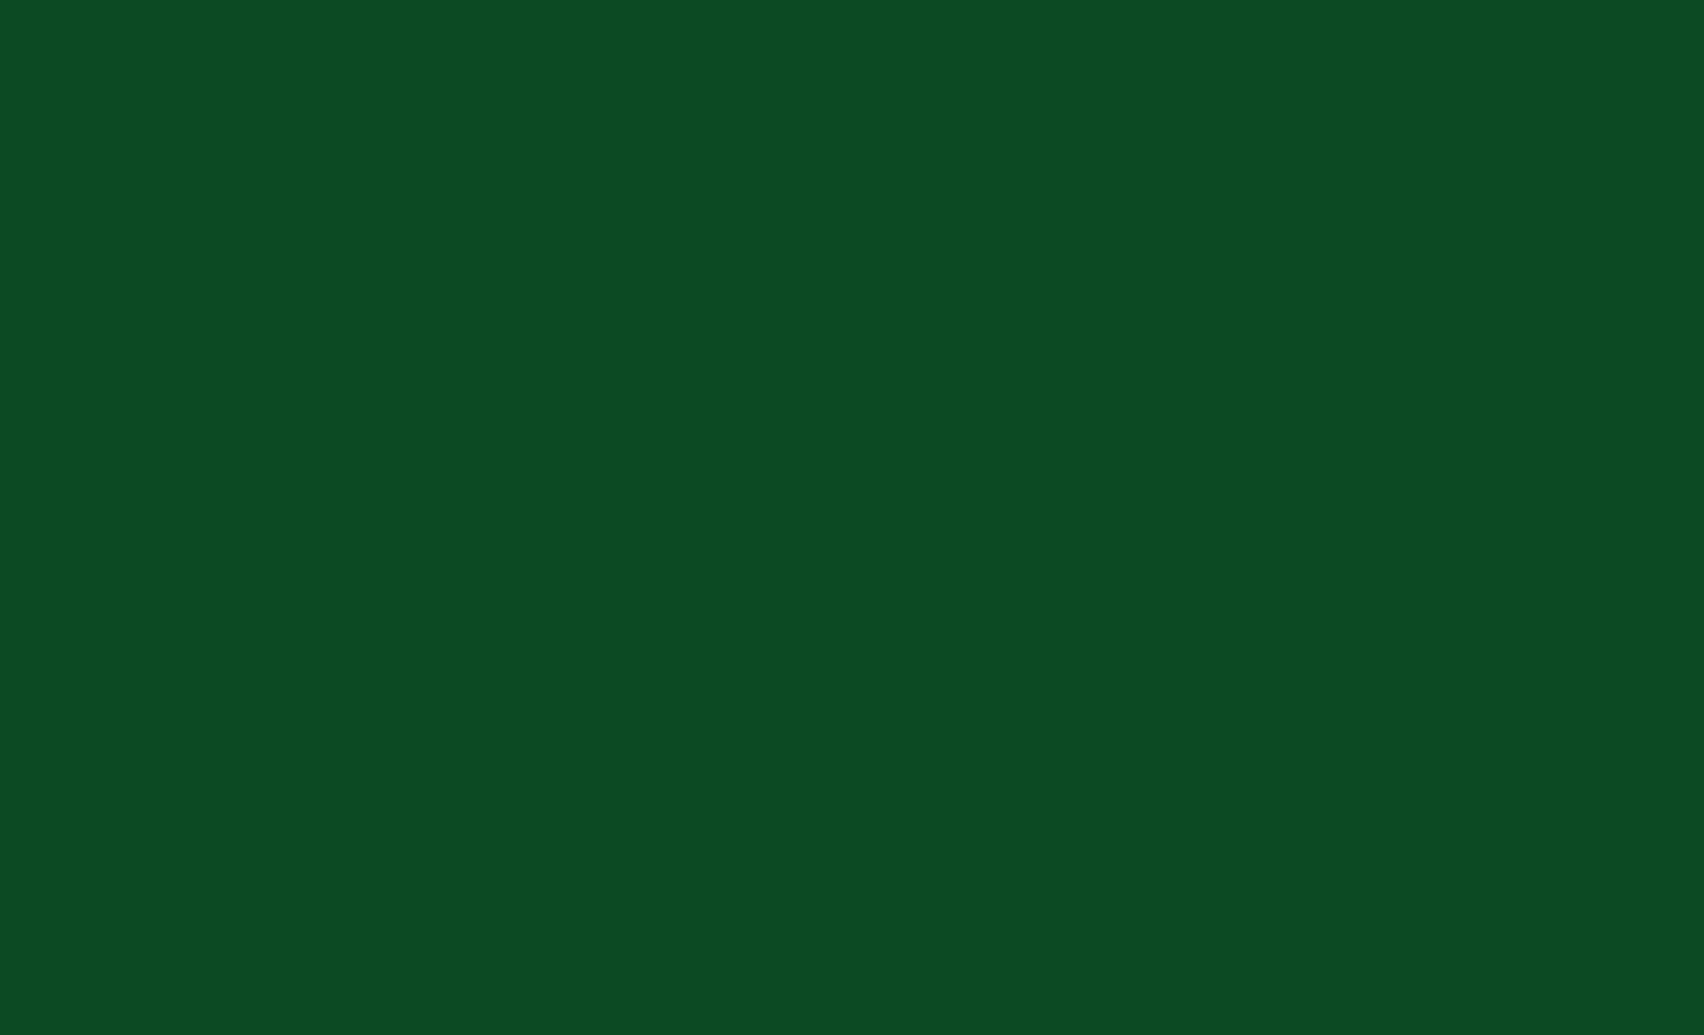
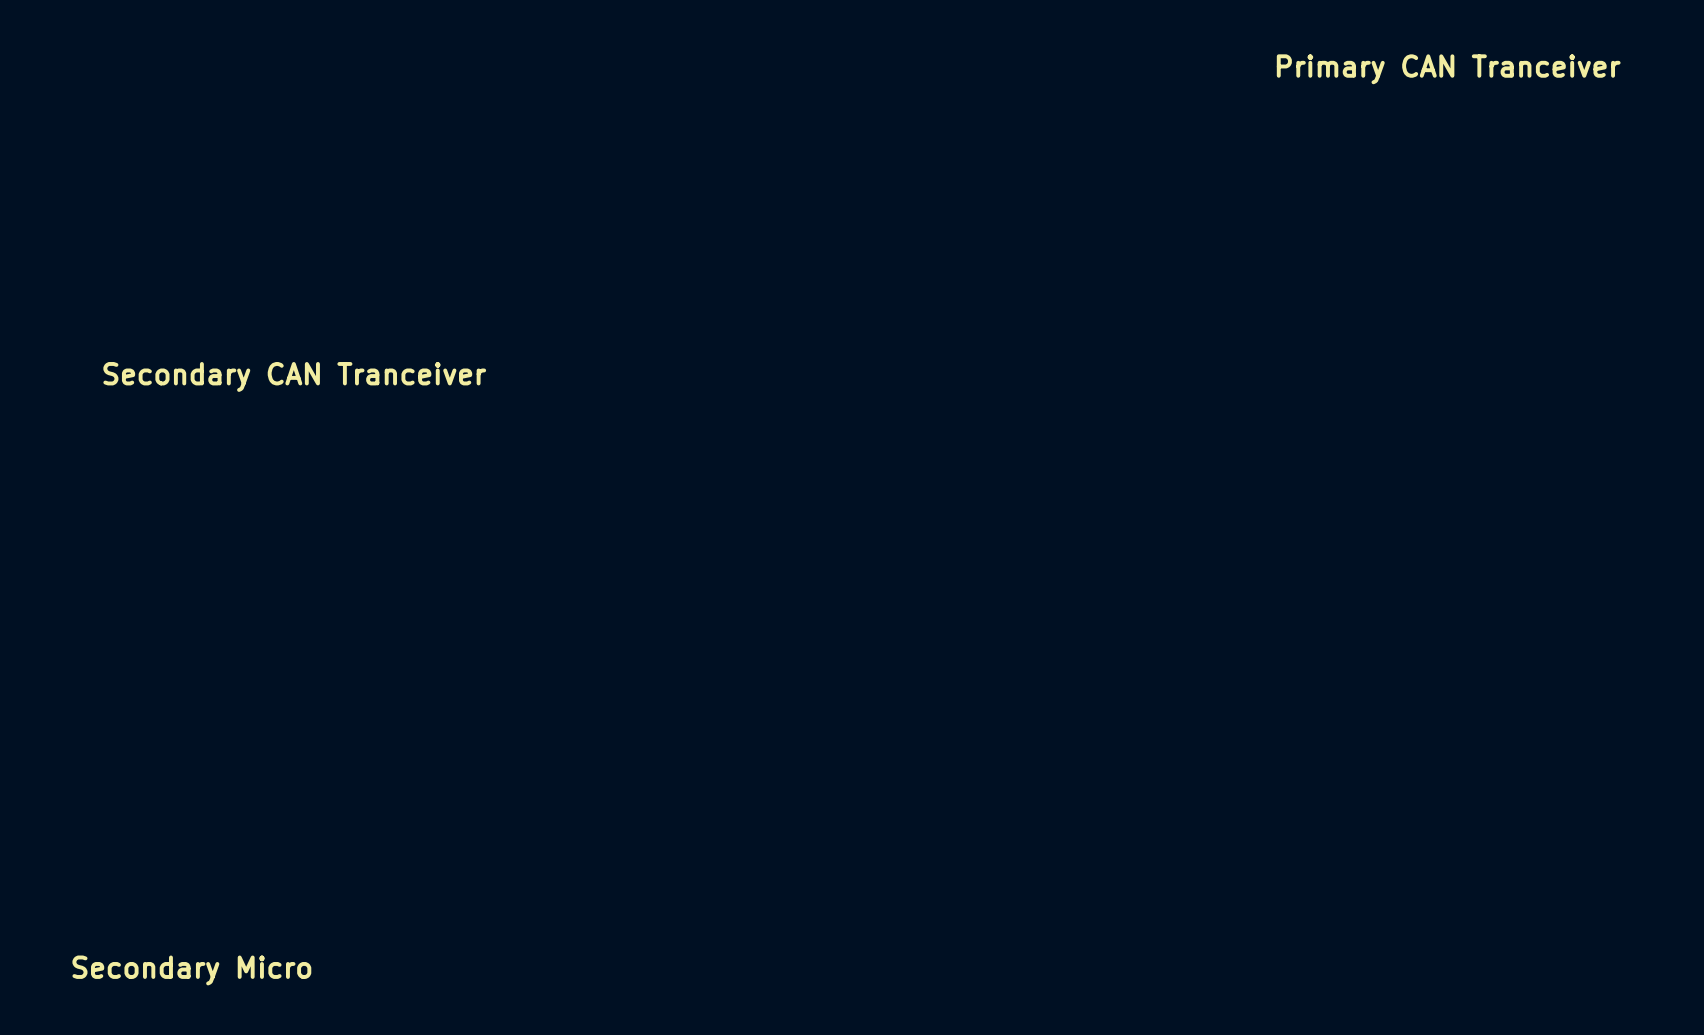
text: none -> Primary CAN Tranceiver (1448, 69)
text: none -> Secondary CAN Tranceiver (294, 376)
text: none -> Secondary Micro (191, 970)

